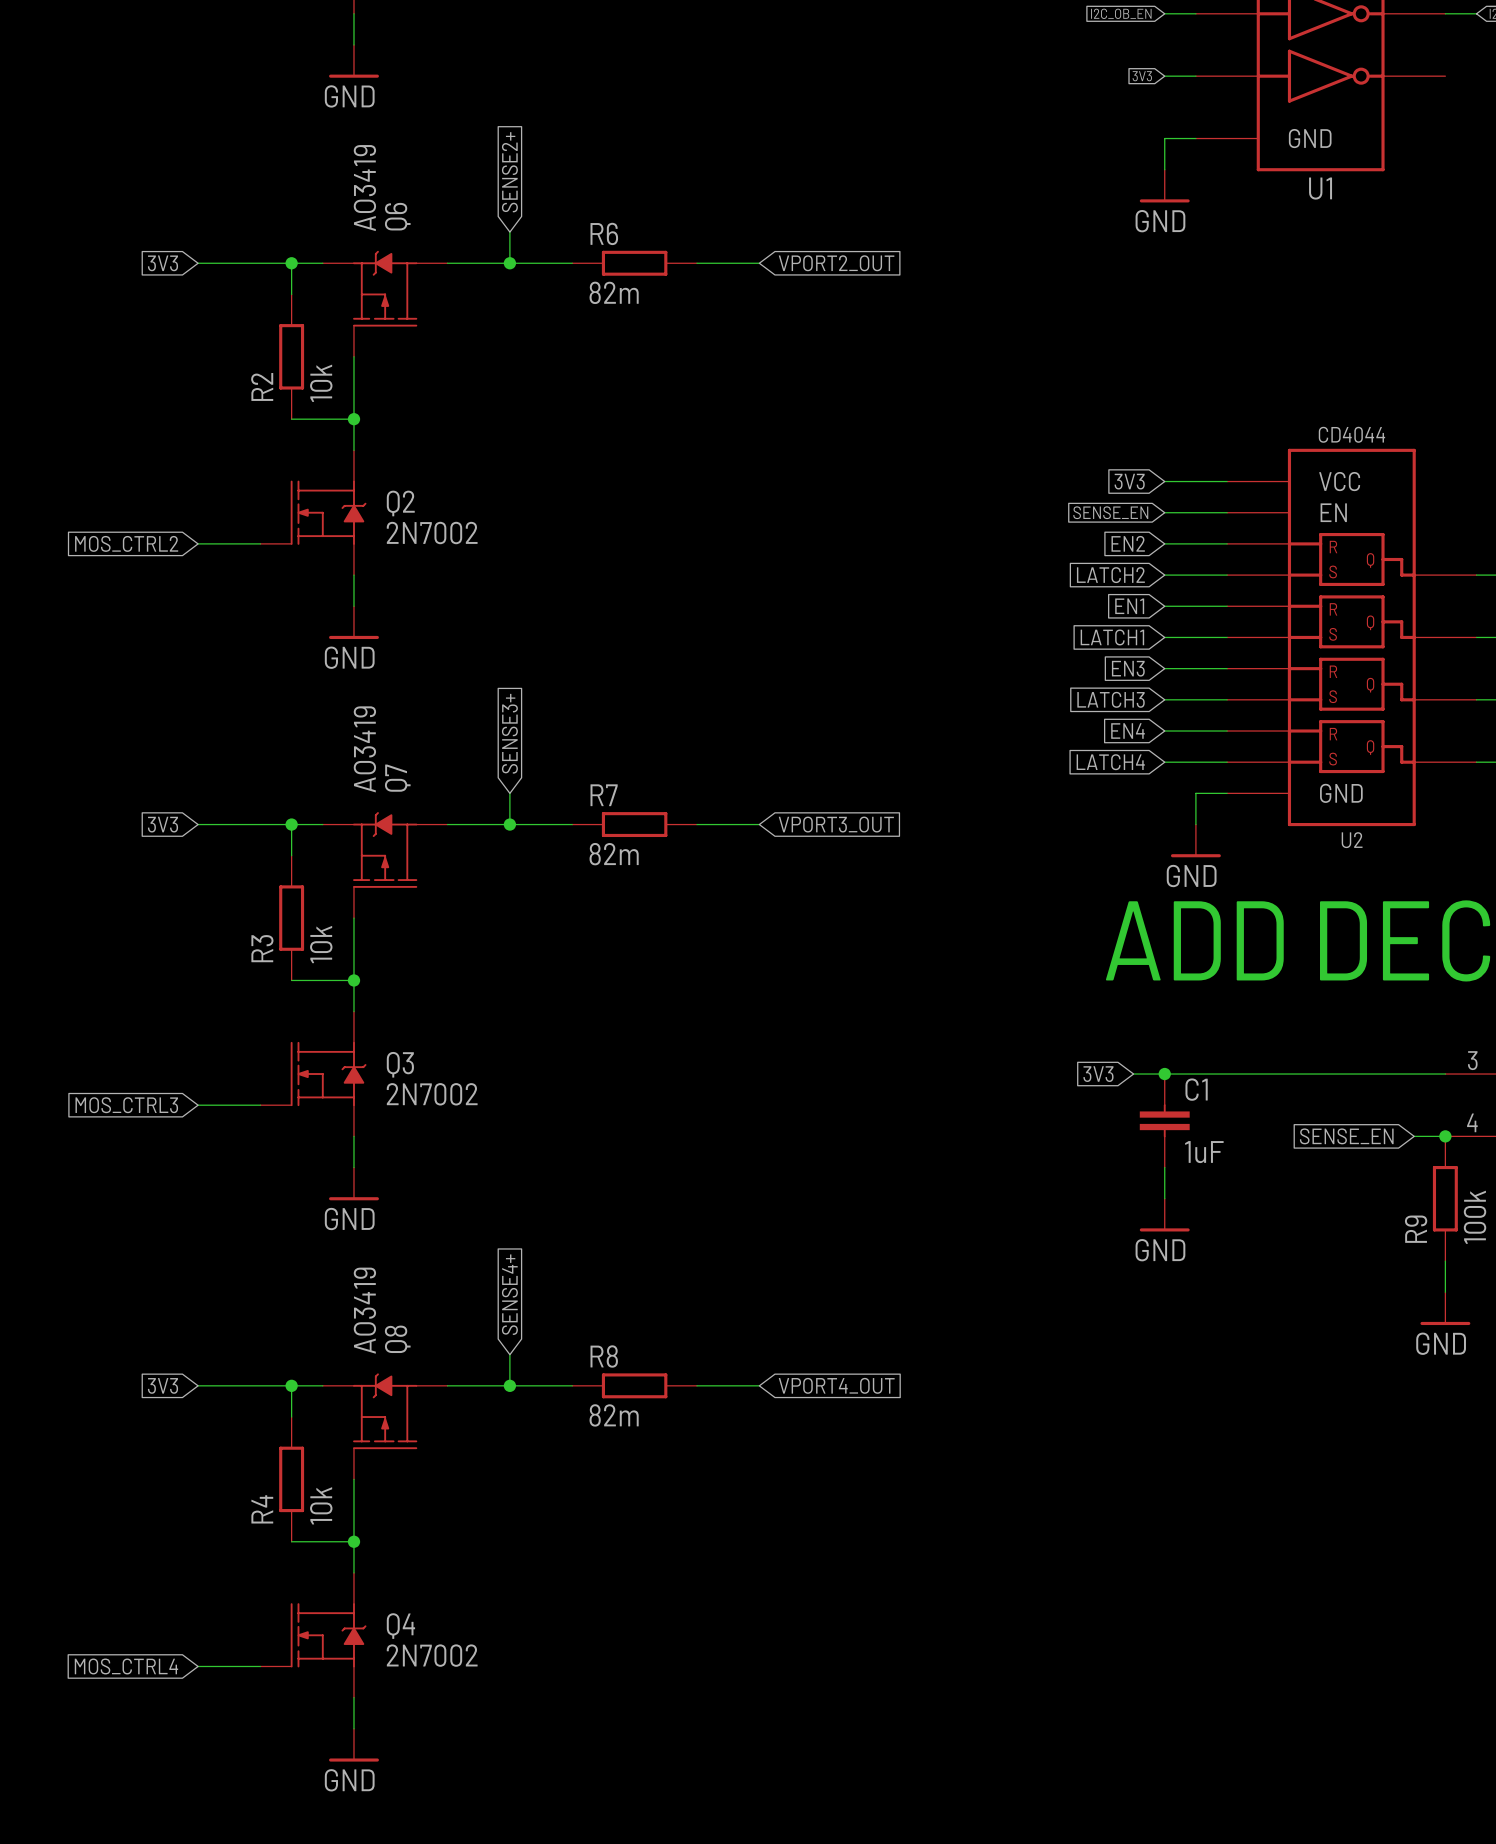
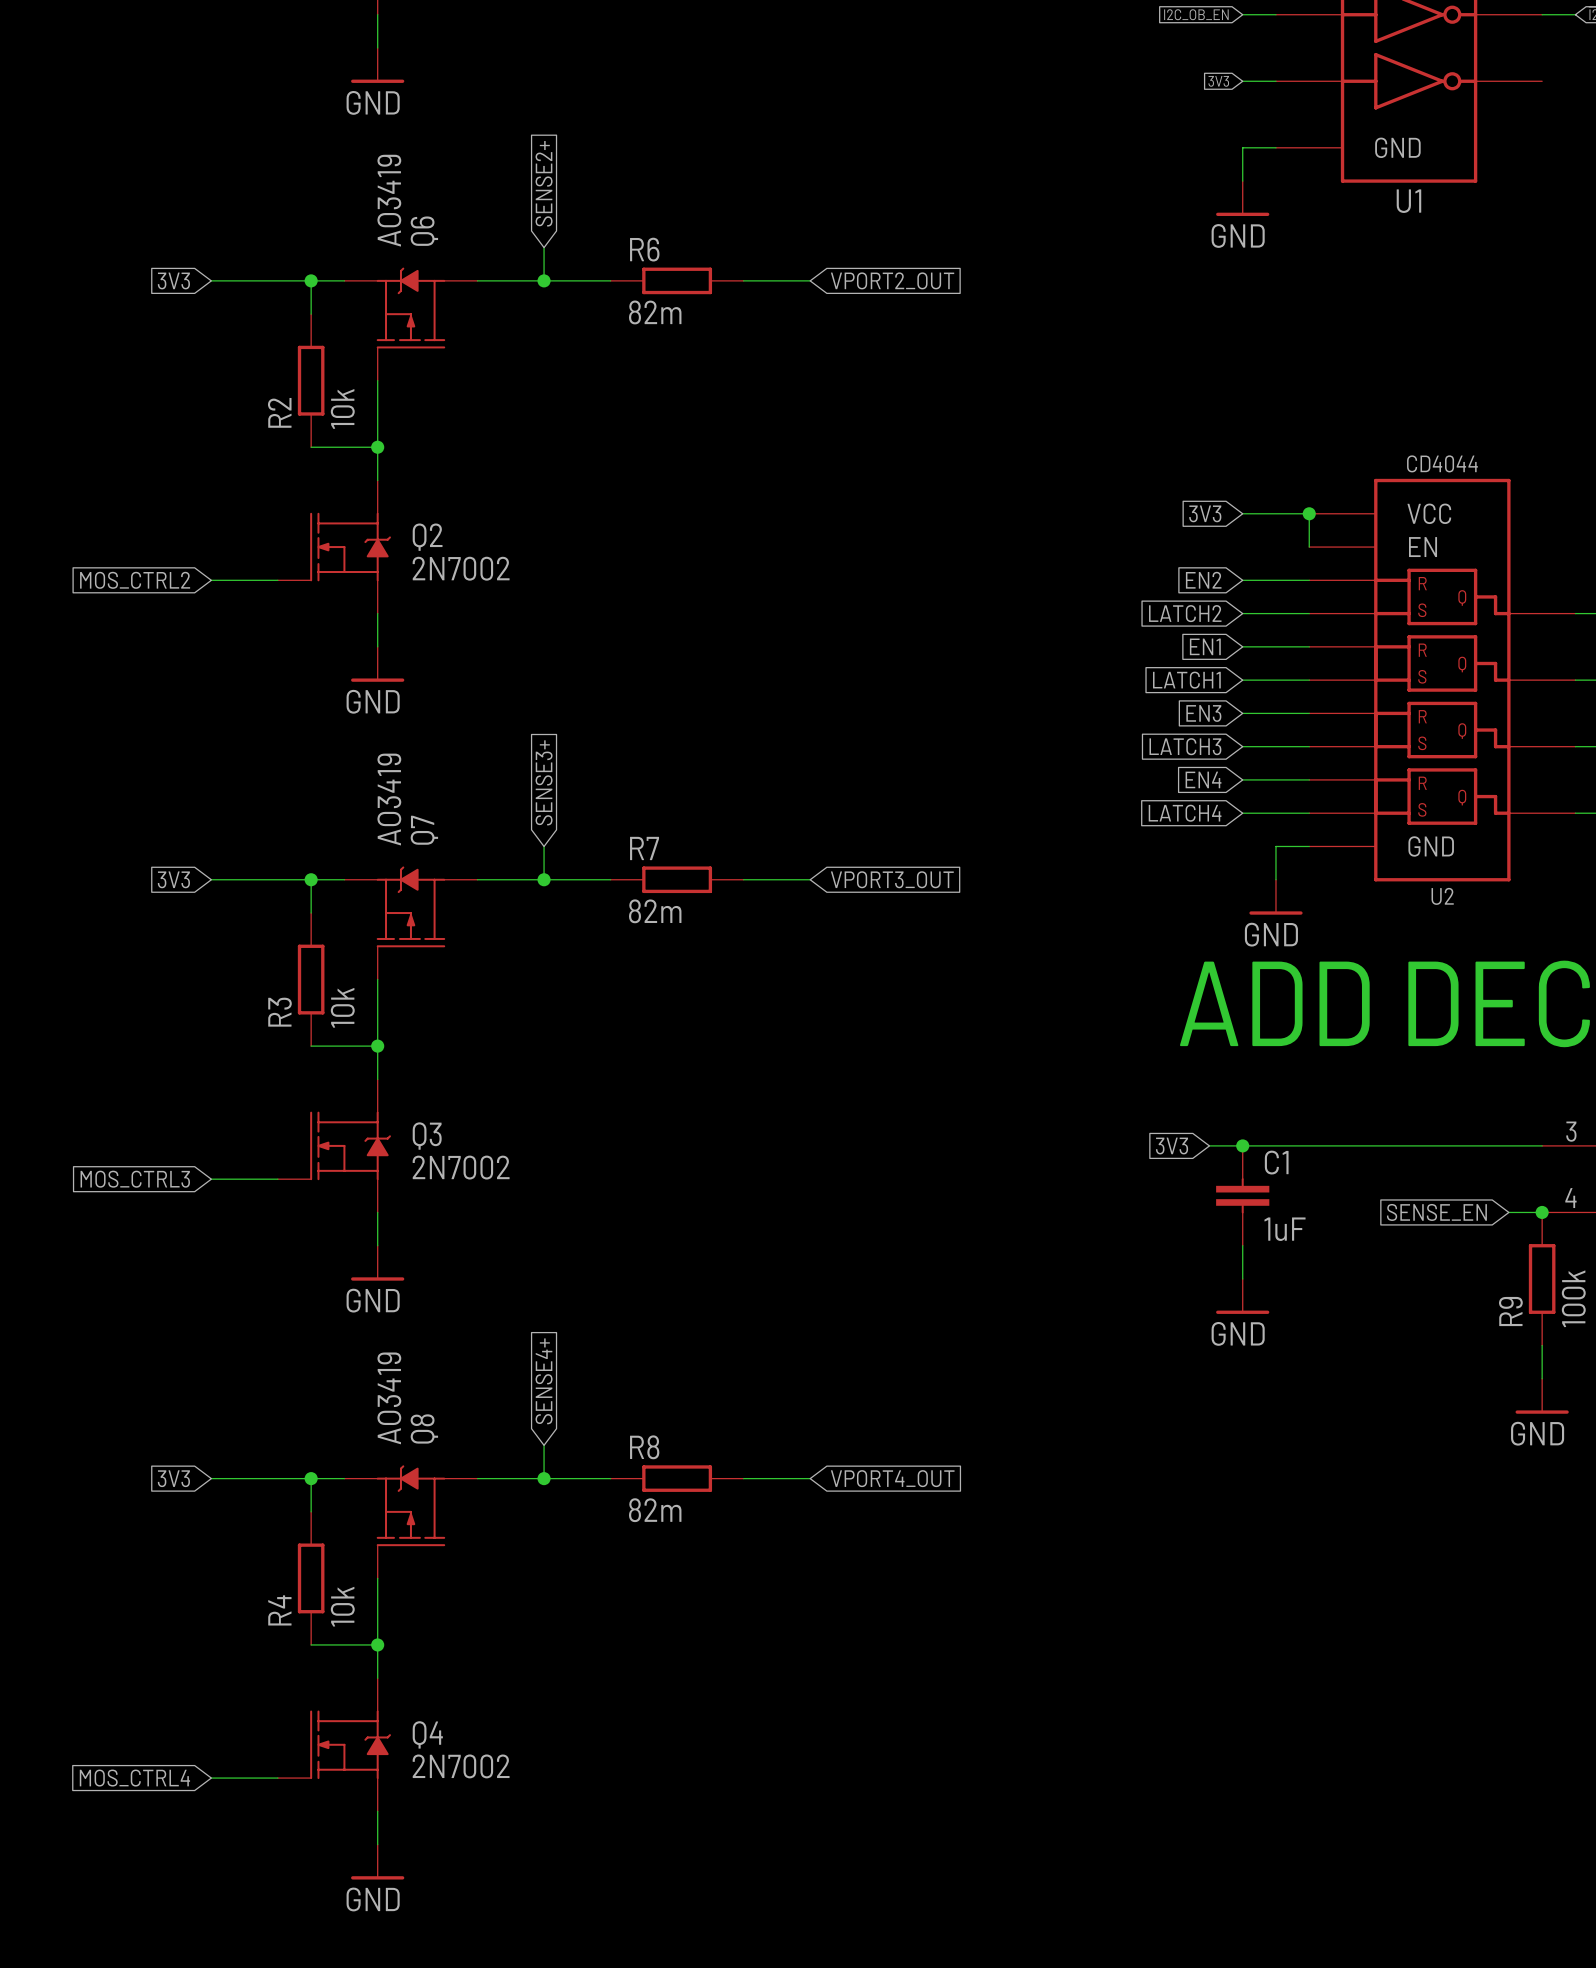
junction: none -> (1309, 513)
global label: SENSE_EN (1110, 512) -> none
wire: (1164, 512) (1227, 512) -> (1309, 513) (1309, 547)

